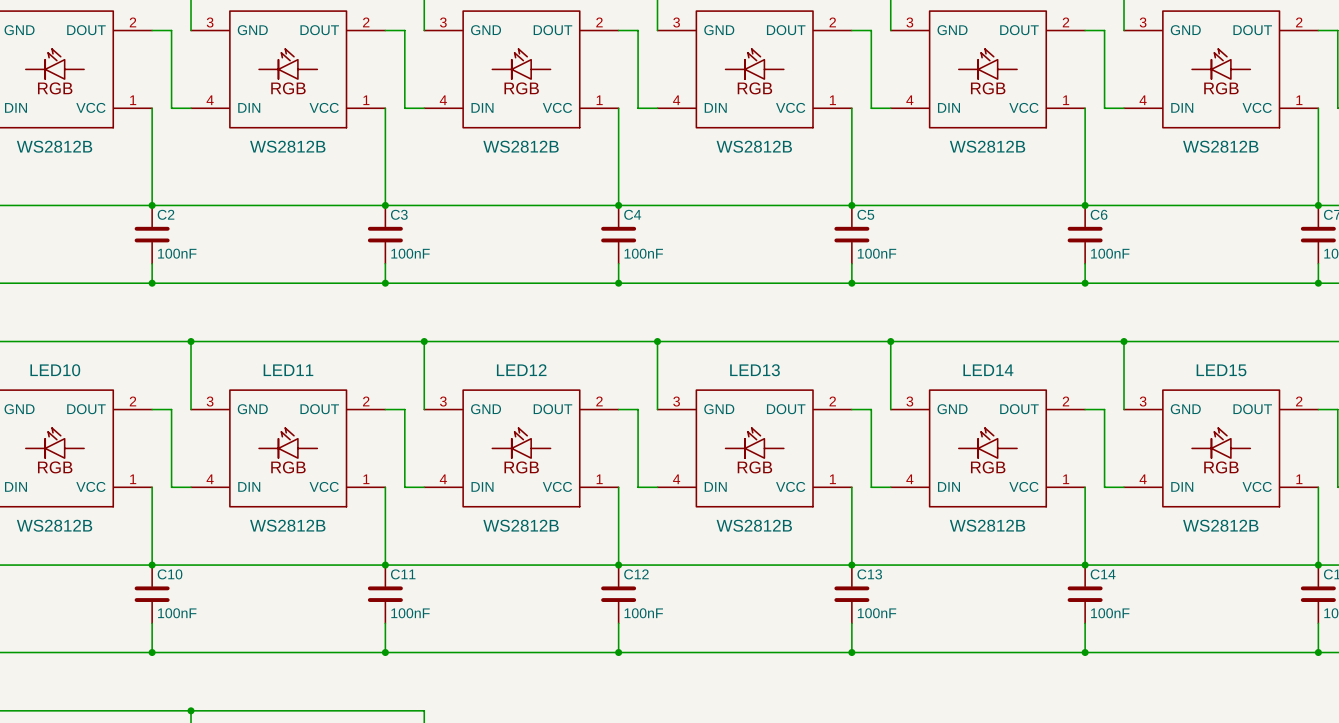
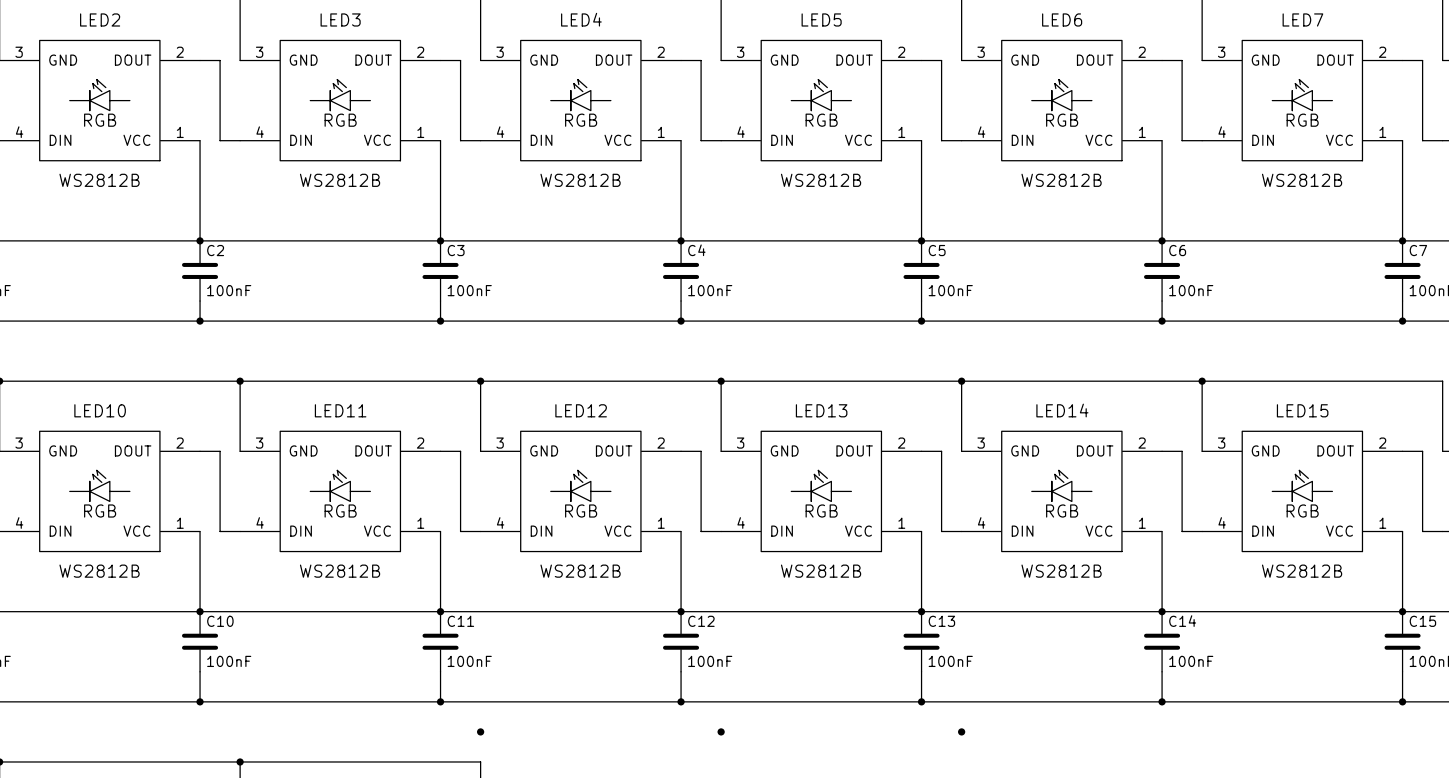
junction: none -> (480, 731)
junction: none -> (721, 731)
junction: none -> (961, 731)

